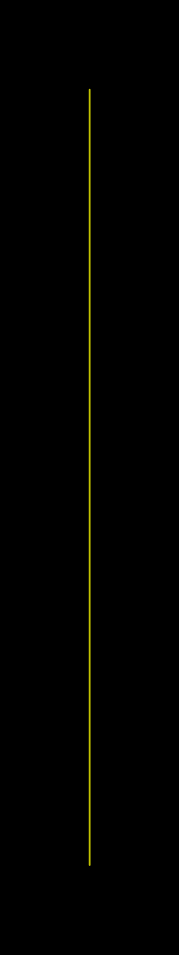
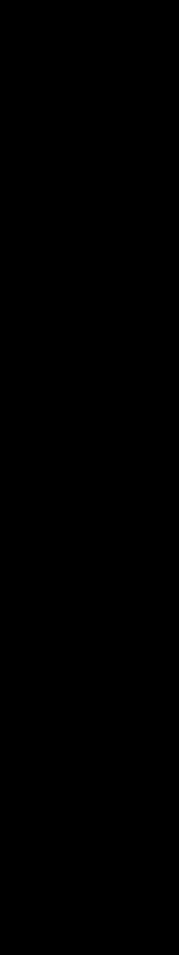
board edge: (89, 89) (89, 865) -> none

